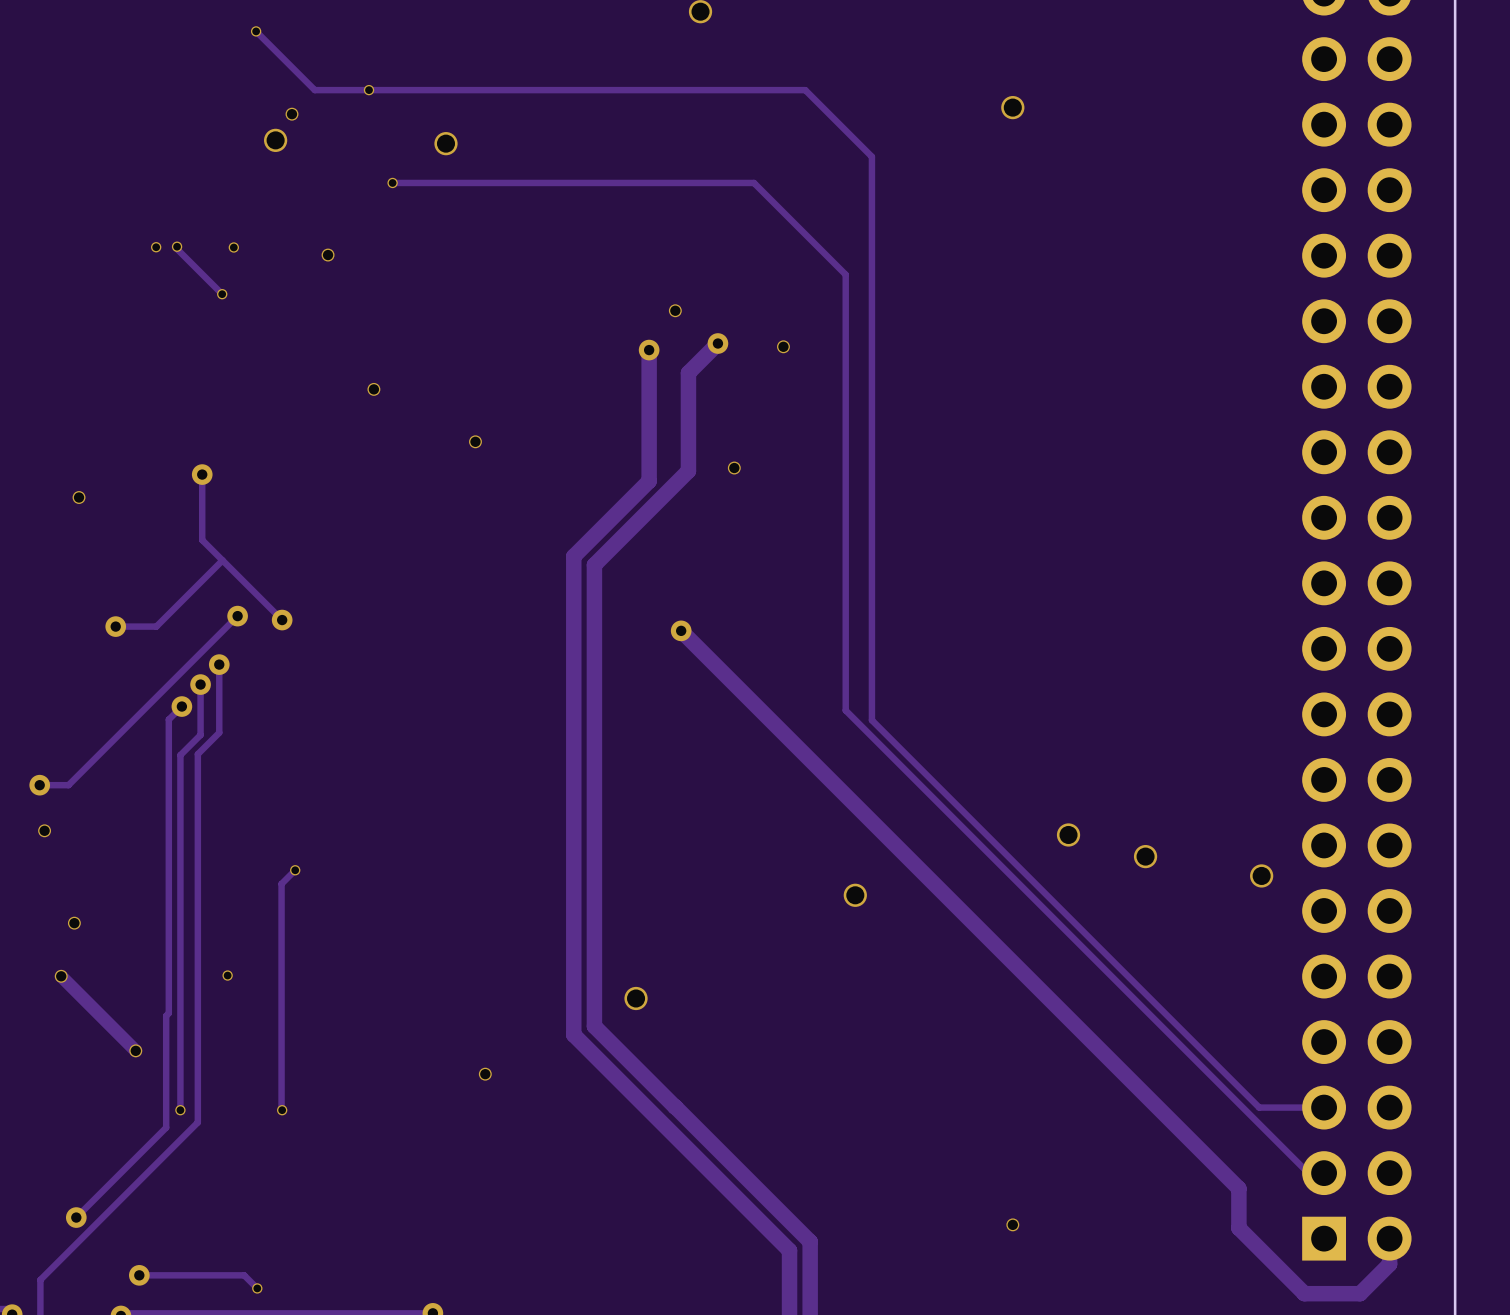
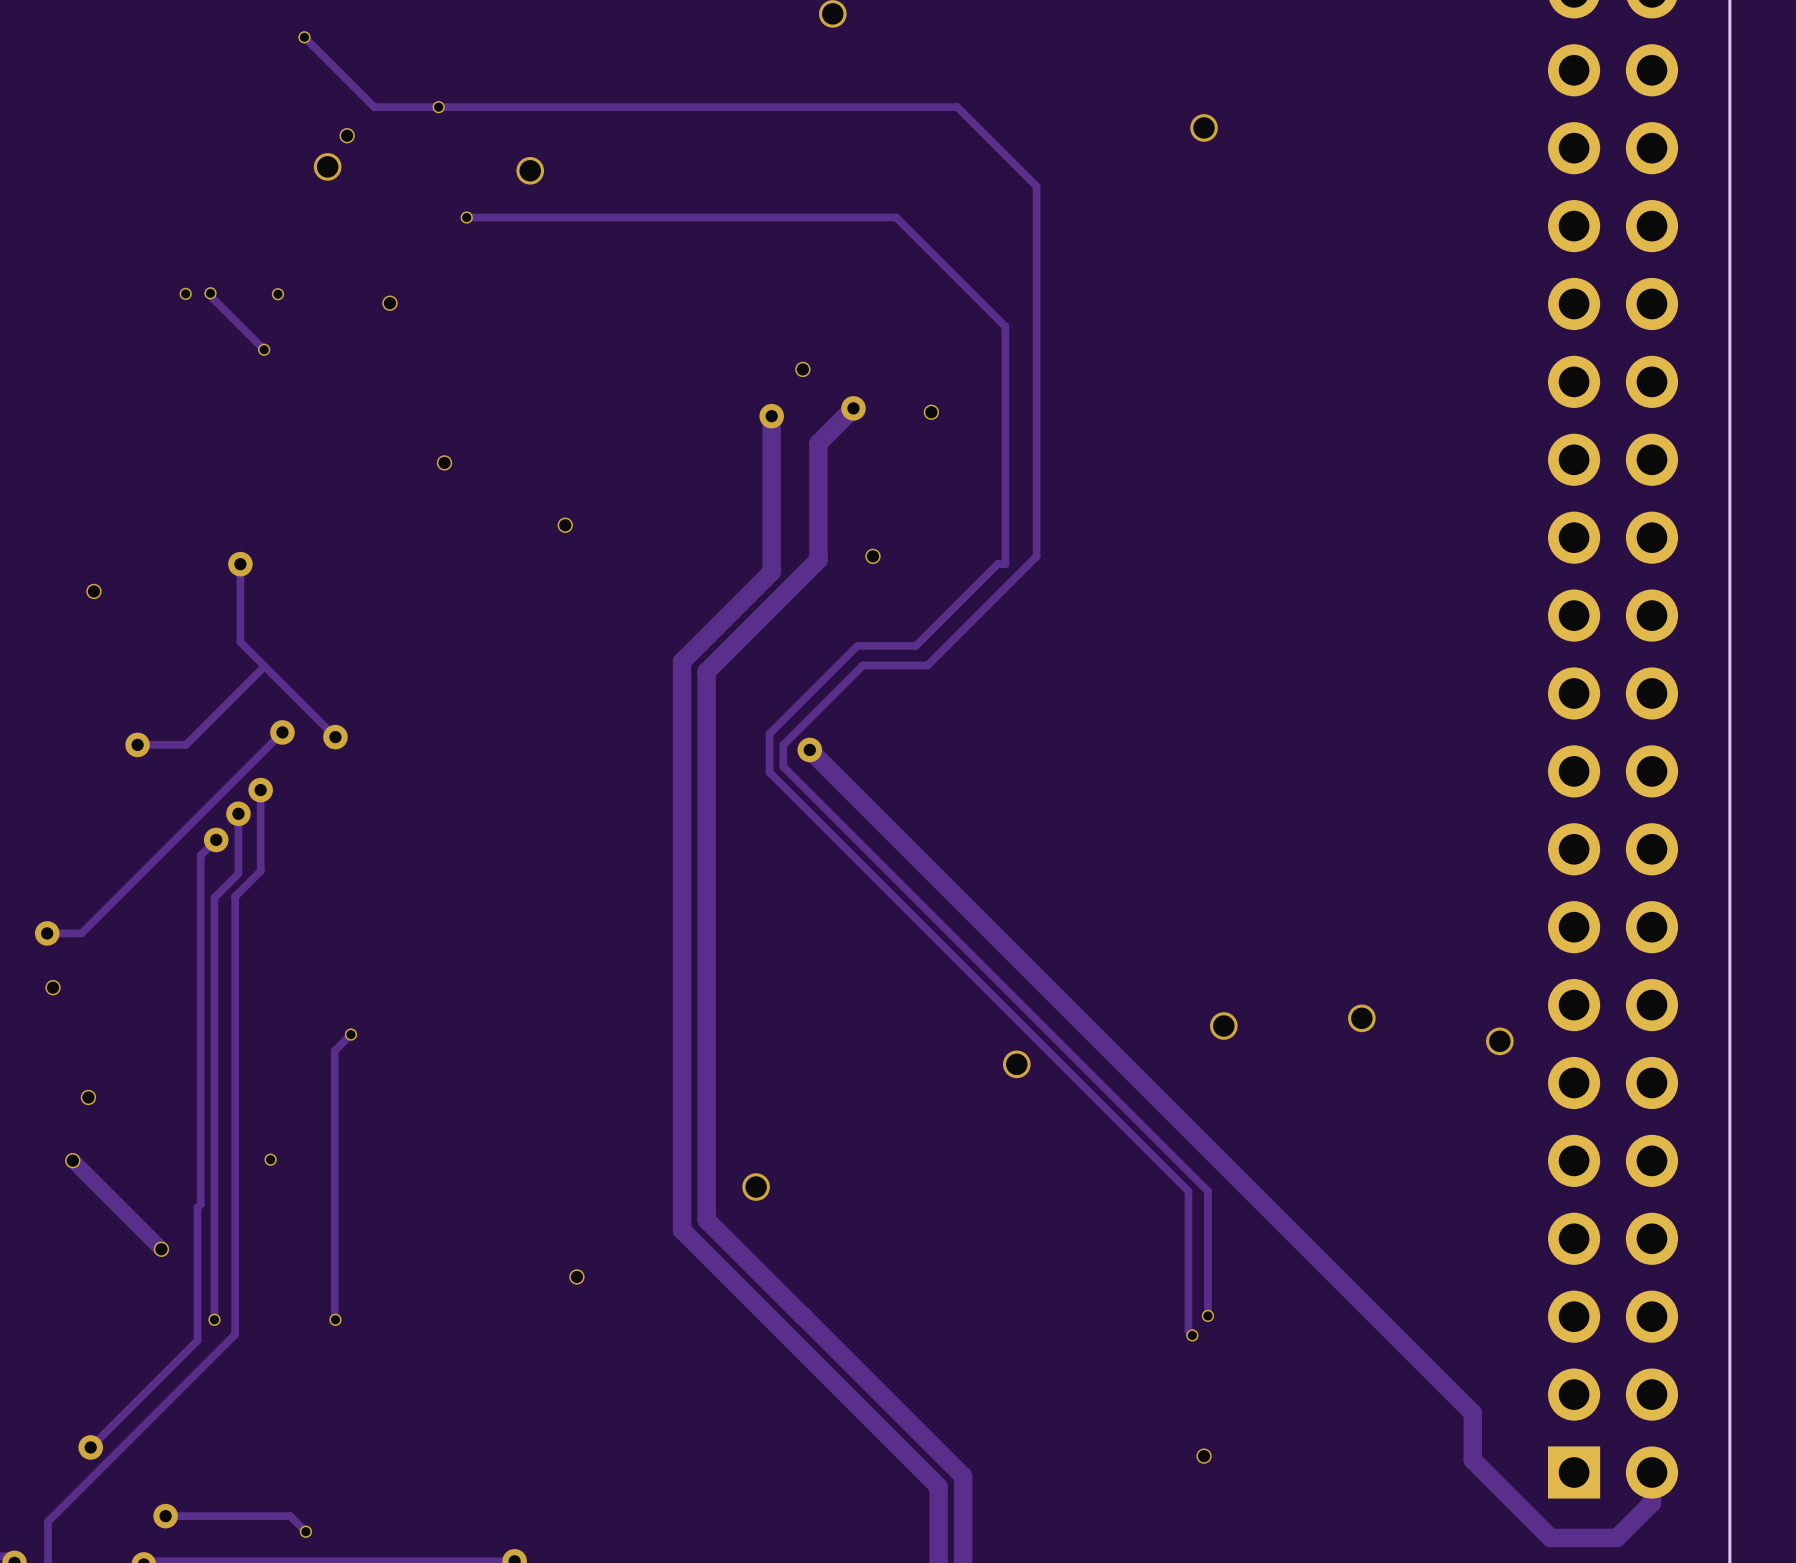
track: (871, 468) (871, 720) (1259, 1107) (1324, 1107) -> (1036, 556) (927, 665) (862, 665) (783, 744) (783, 766) (1207, 1191) (1207, 1315)
track: (845, 474) (845, 710) (1308, 1173) (1324, 1173) -> (1005, 564) (997, 564) (915, 645) (857, 645) (769, 733) (769, 772) (1188, 1191) (1188, 1331) (1192, 1335)
via position: (1068, 834) -> (1223, 1025)
via: none -> (1207, 1315)
via: none -> (1192, 1335)

